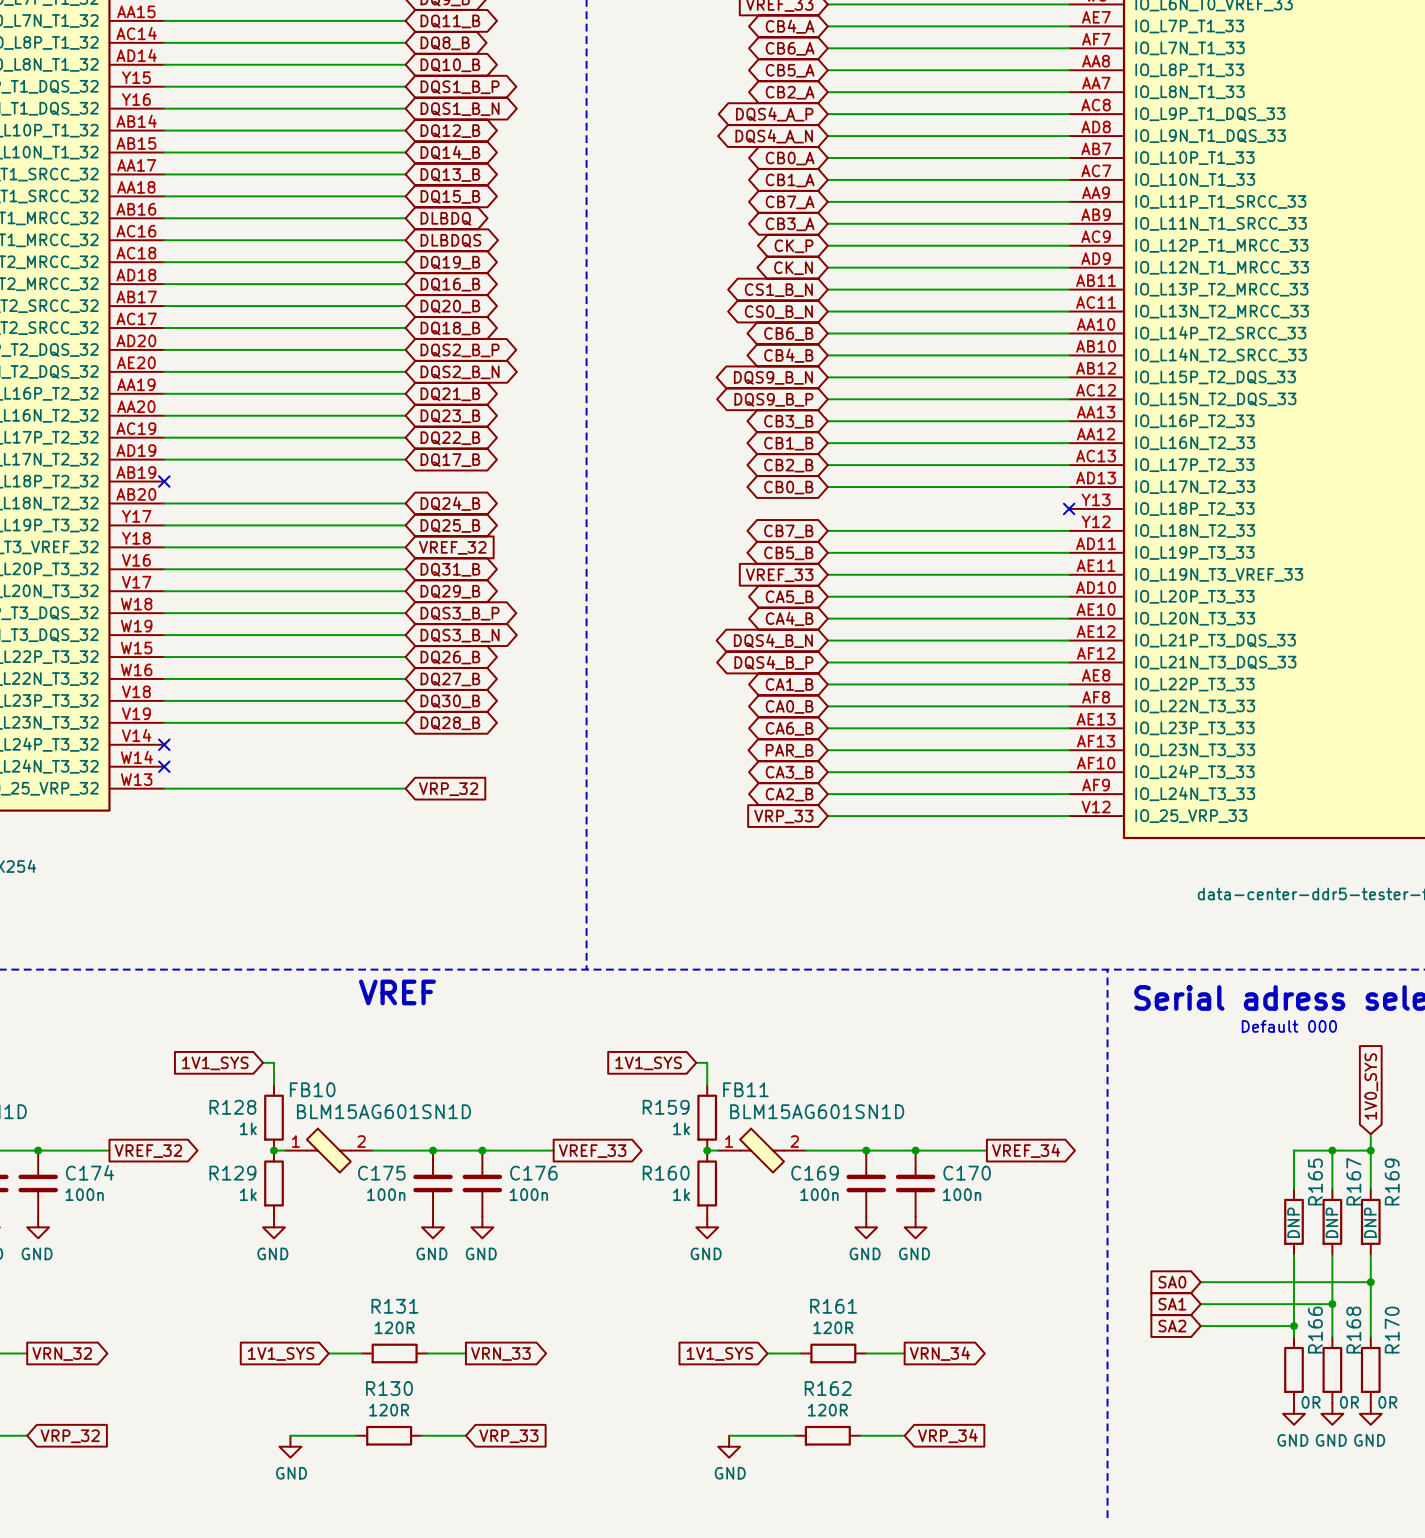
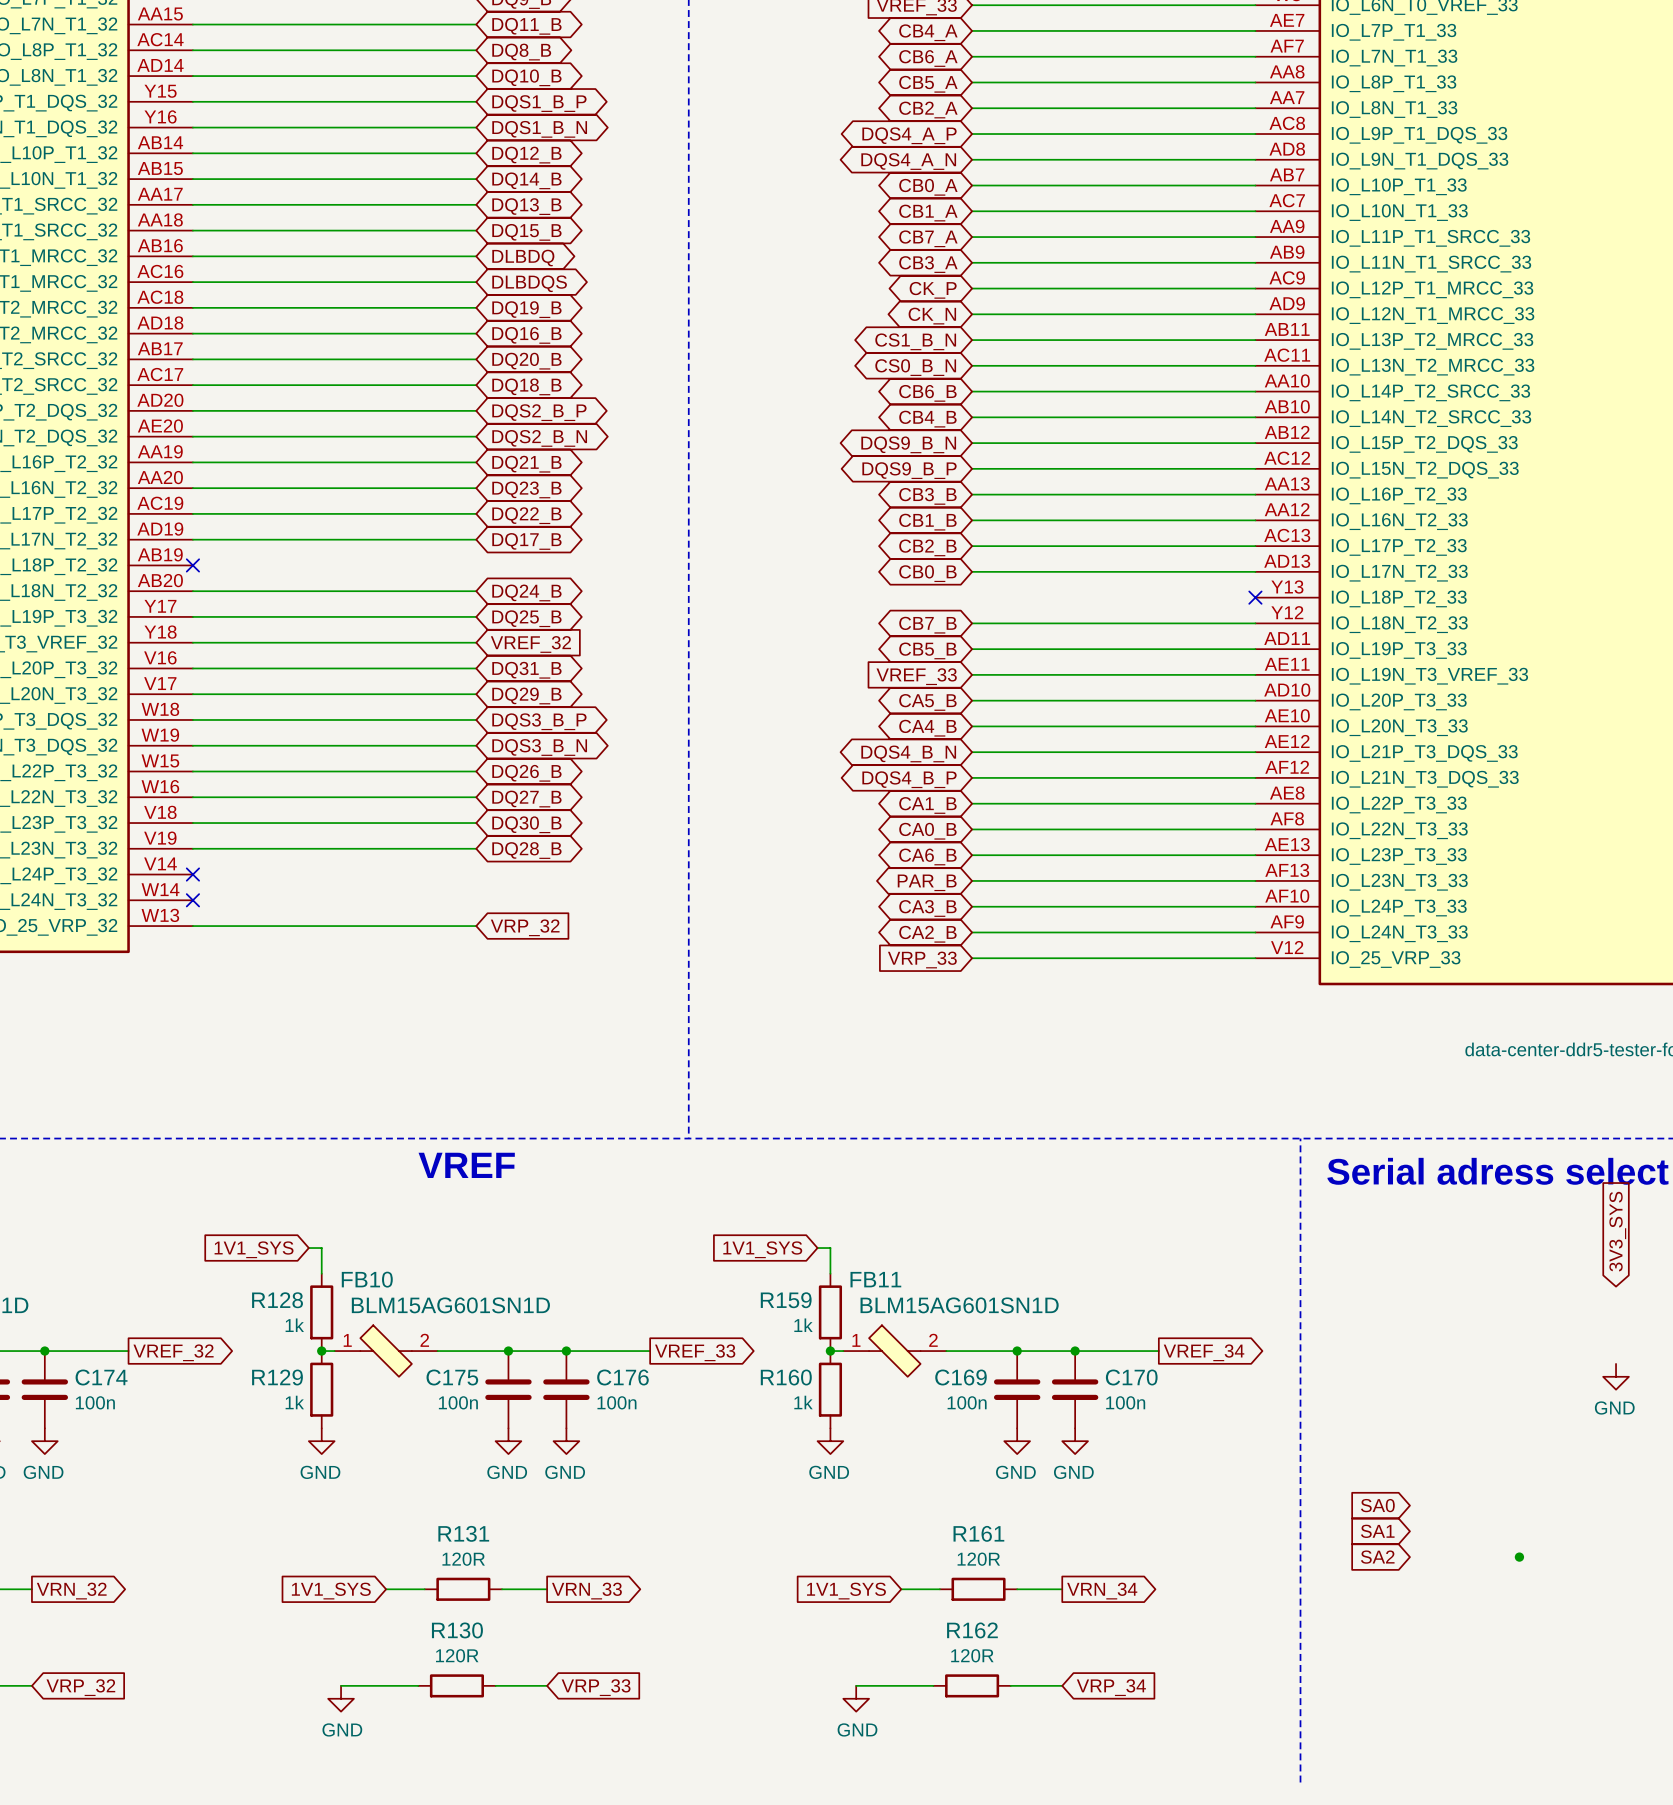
text: Default 000 (1289, 1026) -> none
global label: 1V0_SYS (1371, 1086) -> 3V3_SYS (1617, 1231)
wire: (1370, 1134) (1370, 1188) -> none
wire: (1332, 1150) (1332, 1188) -> none
junction: (1332, 1150) -> none
wire: (1370, 1150) (1293, 1150) (1293, 1188) -> none
junction: (1370, 1150) -> none
power symbol: none -> GND (1616, 1376)
R165: (1293, 1221) -> none
R167: (1332, 1221) -> none
R169: (1370, 1221) -> none
wire: (1293, 1254) (1293, 1337) -> none
wire: (1332, 1254) (1332, 1337) -> none
wire: (1370, 1254) (1370, 1337) -> none
wire: (1200, 1282) (1370, 1282) -> none
junction: (1370, 1282) -> none
wire: (1200, 1304) (1332, 1304) -> none
junction: (1332, 1304) -> none
wire: (1200, 1326) (1293, 1326) -> none
R166: (1293, 1369) -> none
R168: (1332, 1369) -> none
R170: (1370, 1369) -> none
power symbol: GND (1293, 1413) -> none
power symbol: GND (1332, 1413) -> none
power symbol: GND (1370, 1413) -> none

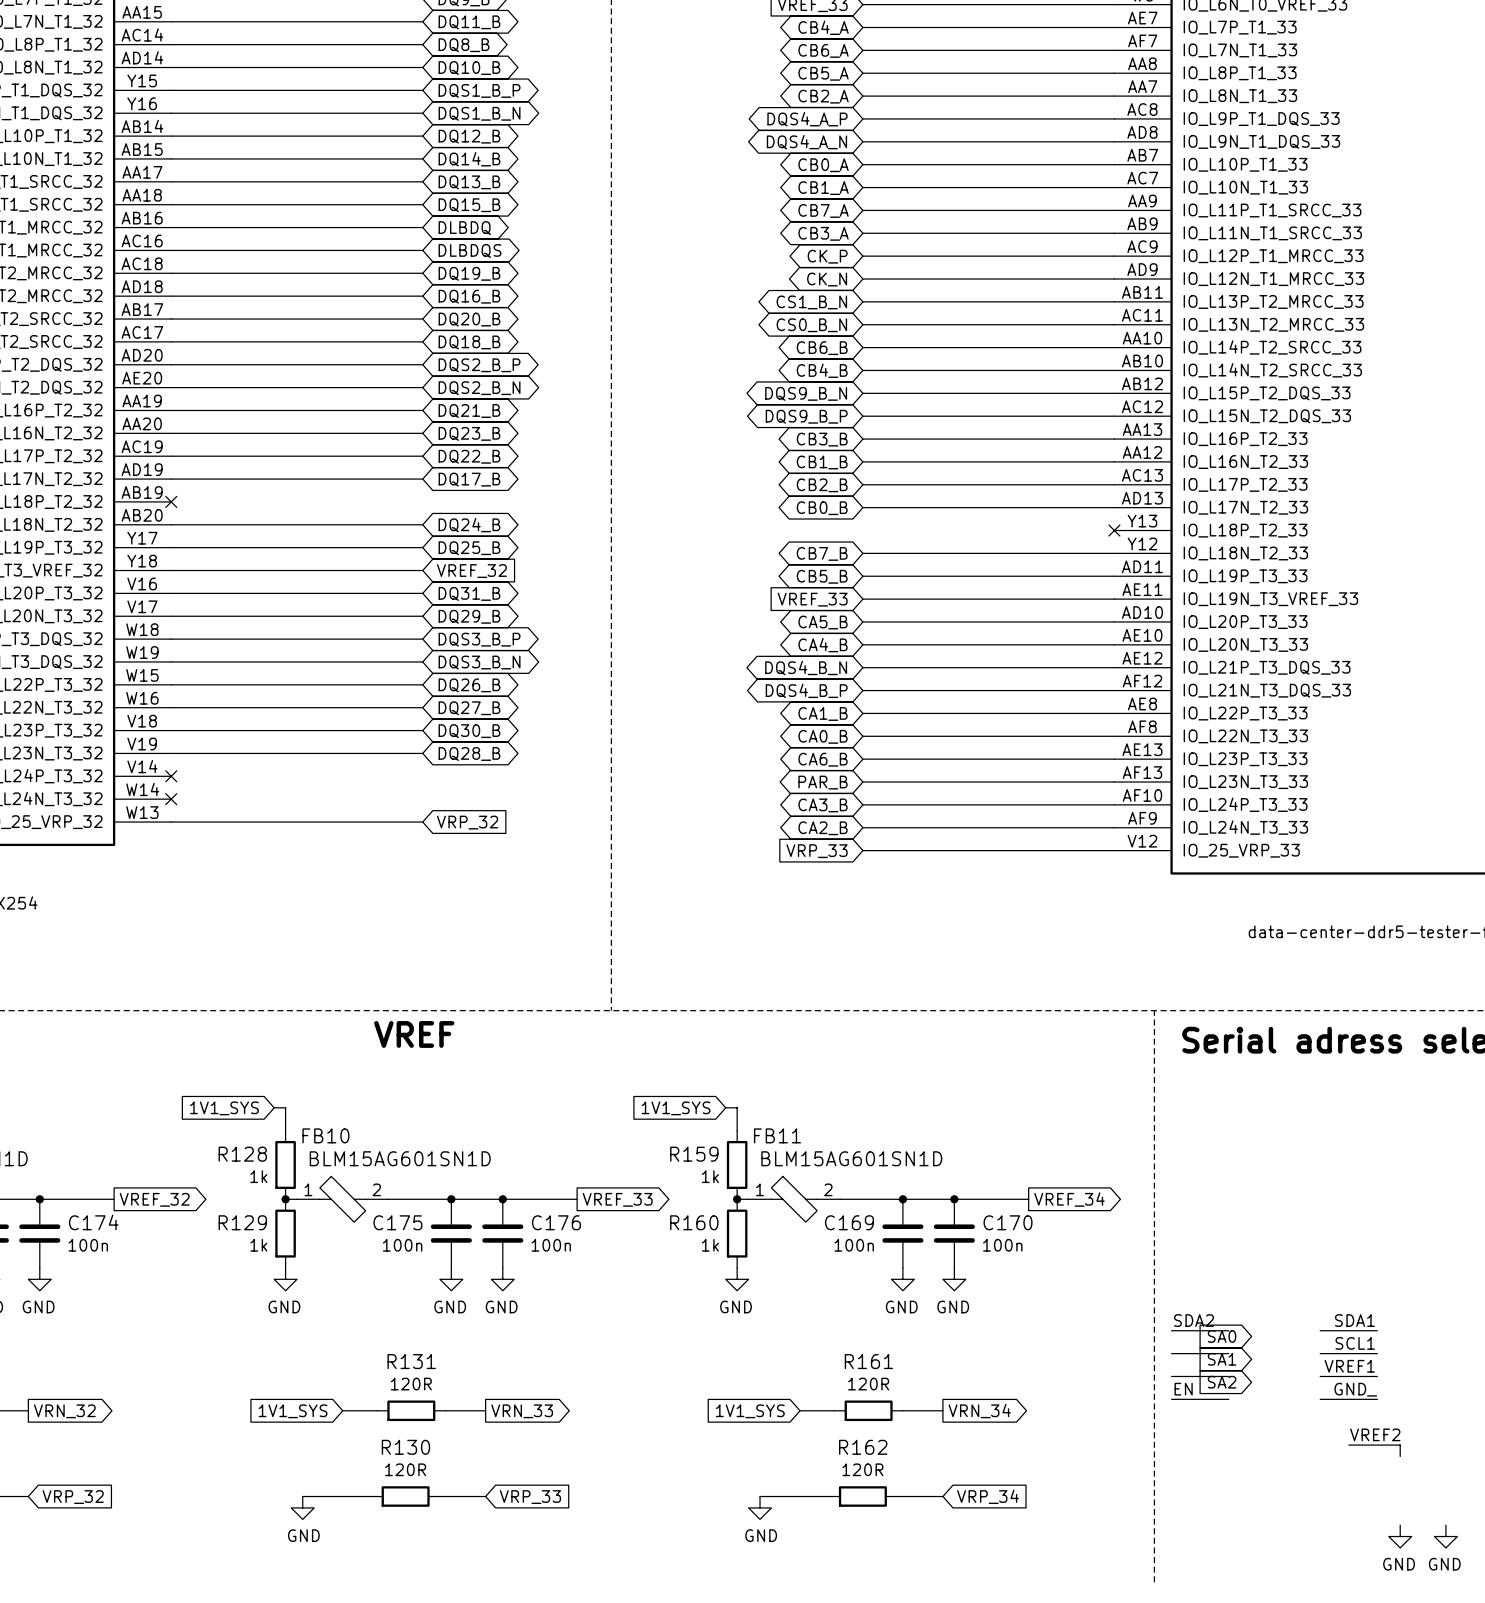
global label: 3V3_SYS (1617, 1231) -> none
power symbol: GND (1616, 1376) -> none
label: none -> SDA2 (1193, 1320)
label: none -> SDA1 (1354, 1320)
wire: none -> (1171, 1330) (1228, 1330)
wire: none -> (1320, 1330) (1377, 1330)
label: none -> SCL1 (1355, 1343)
wire: none -> (1171, 1353) (1228, 1353)
wire: none -> (1320, 1353) (1377, 1353)
label: none -> VREF1 (1349, 1366)
wire: none -> (1171, 1376) (1228, 1376)
wire: none -> (1320, 1376) (1377, 1376)
junction: (1519, 1557) -> none
label: none -> EN (1183, 1389)
label: none -> GND_ (1355, 1389)
wire: none -> (1171, 1399) (1228, 1399)
wire: none -> (1320, 1399) (1377, 1399)
label: none -> VREF2 (1375, 1434)
wire: none -> (1348, 1445) (1400, 1445) (1400, 1456)
power symbol: none -> GND (1400, 1536)
power symbol: none -> GND (1445, 1536)

